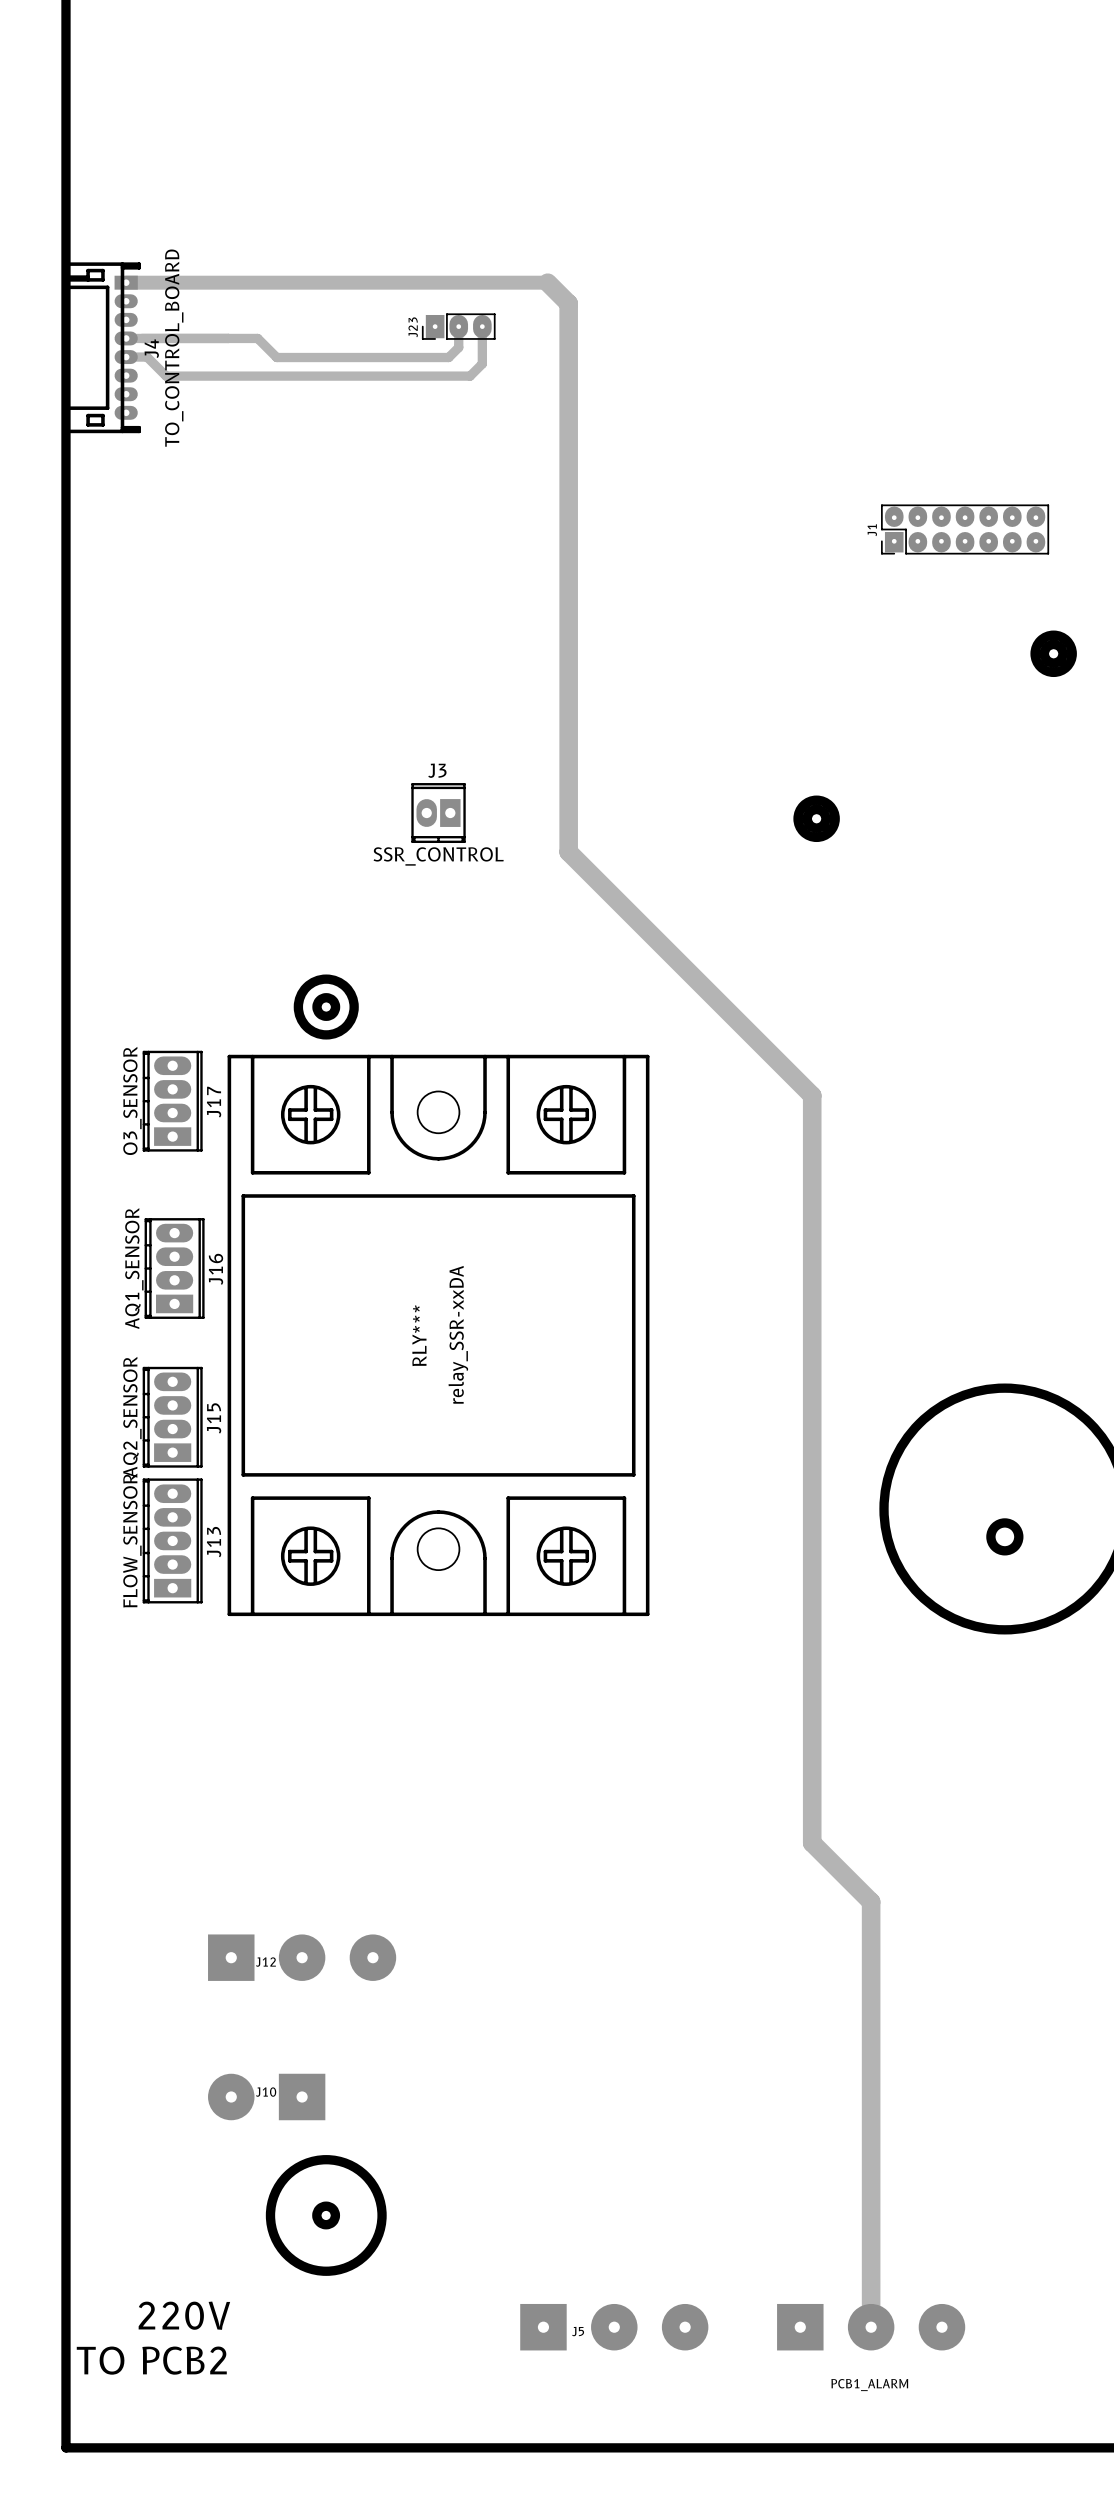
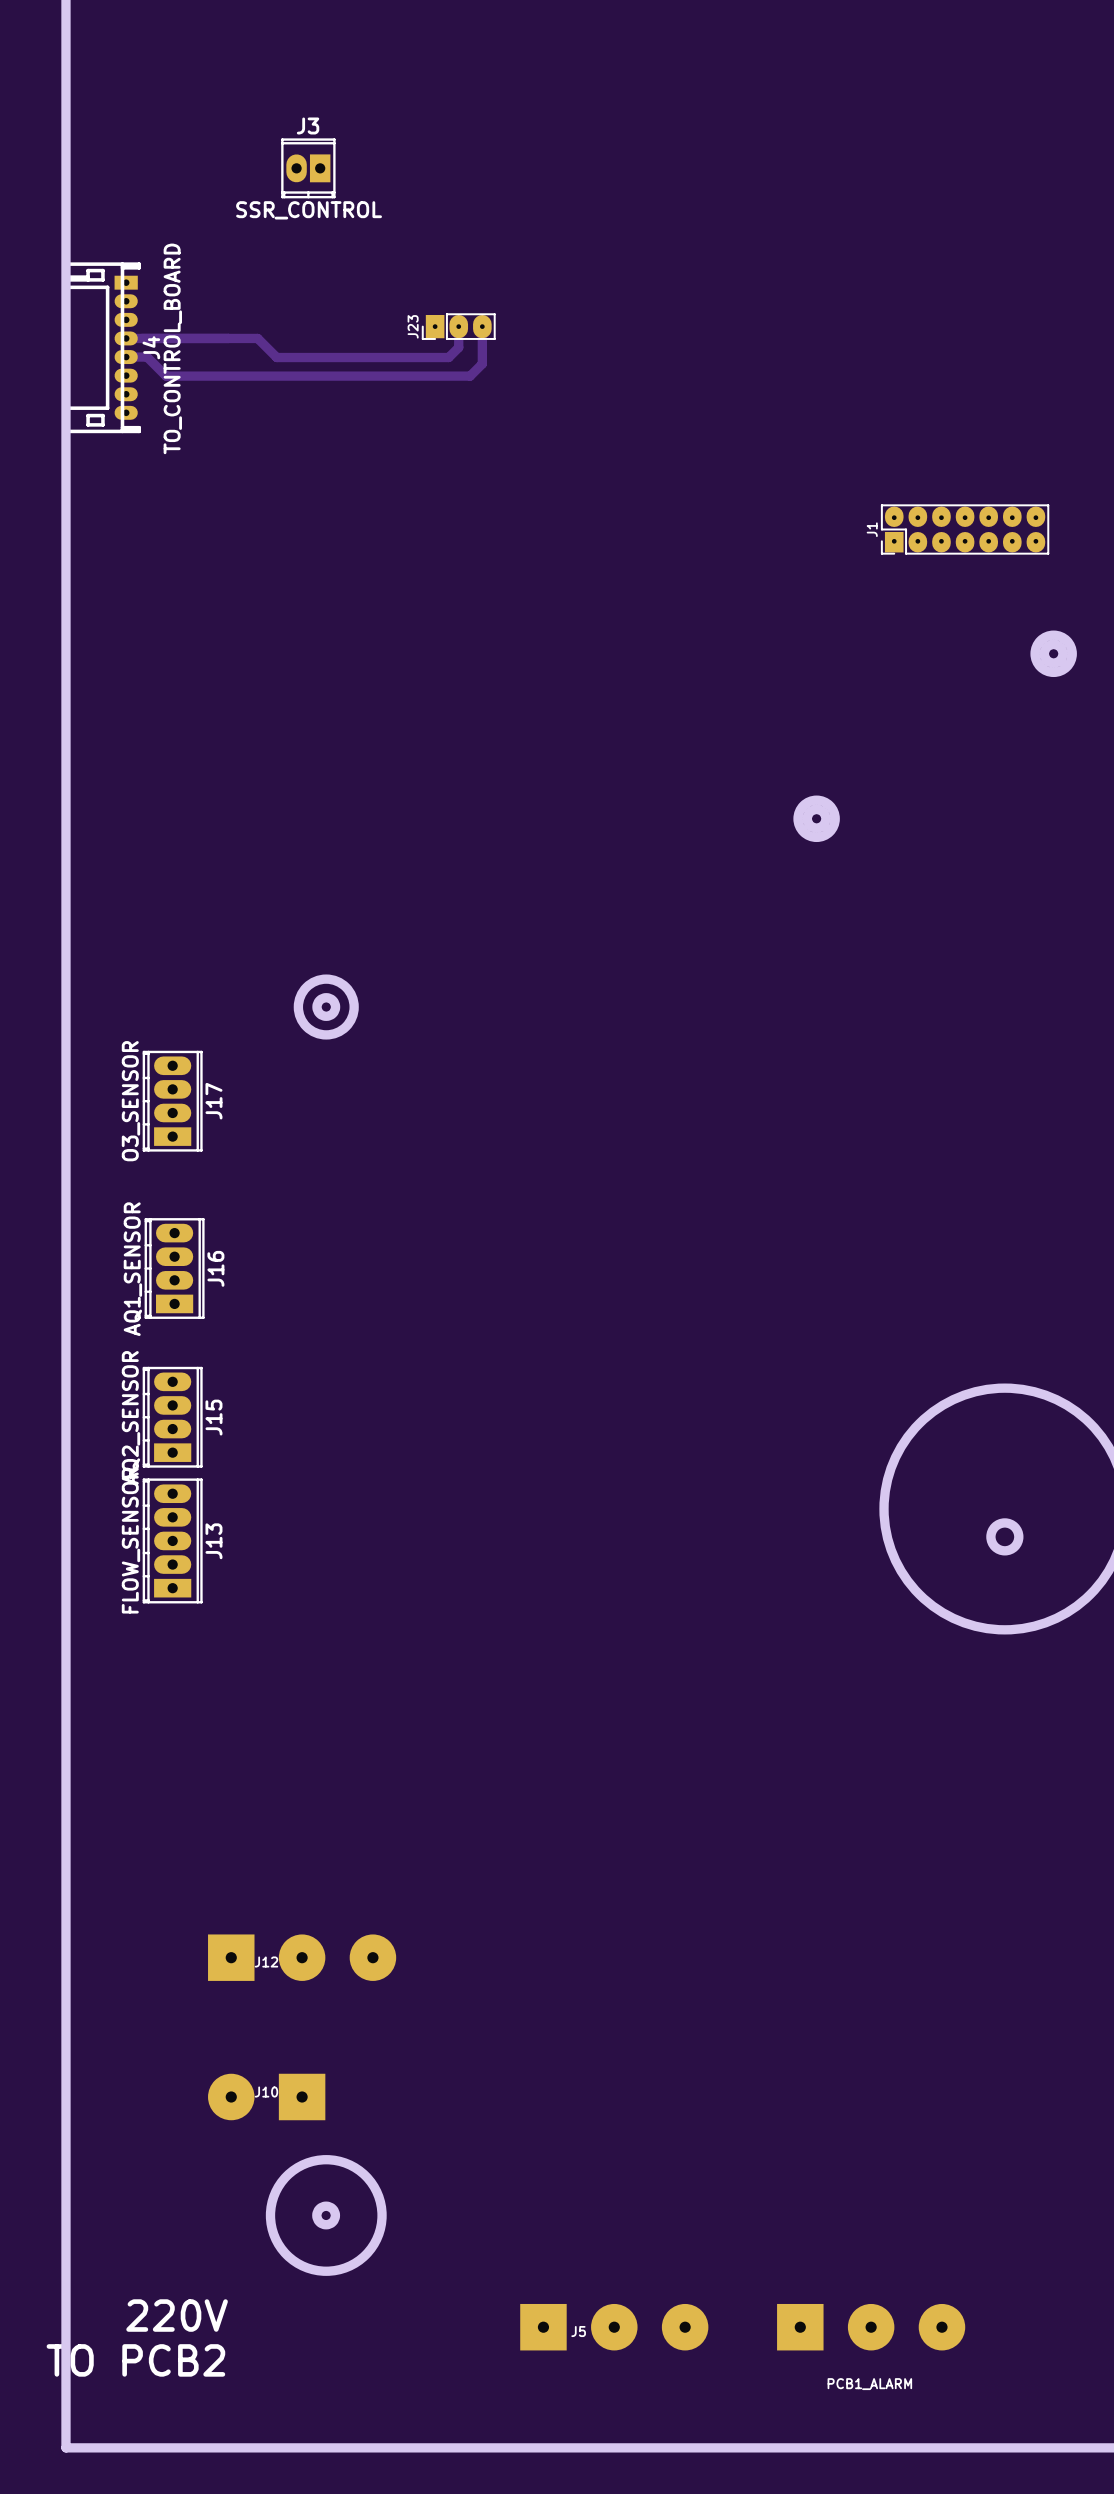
track: (126, 282) (547, 282) (568, 303) (568, 852) (812, 1095) (812, 1842) (871, 1901) (871, 2327) -> none
J3 position: (438, 813) -> (308, 168)
RLY***: relay_SSR-xxDA (438, 1335) -> none

